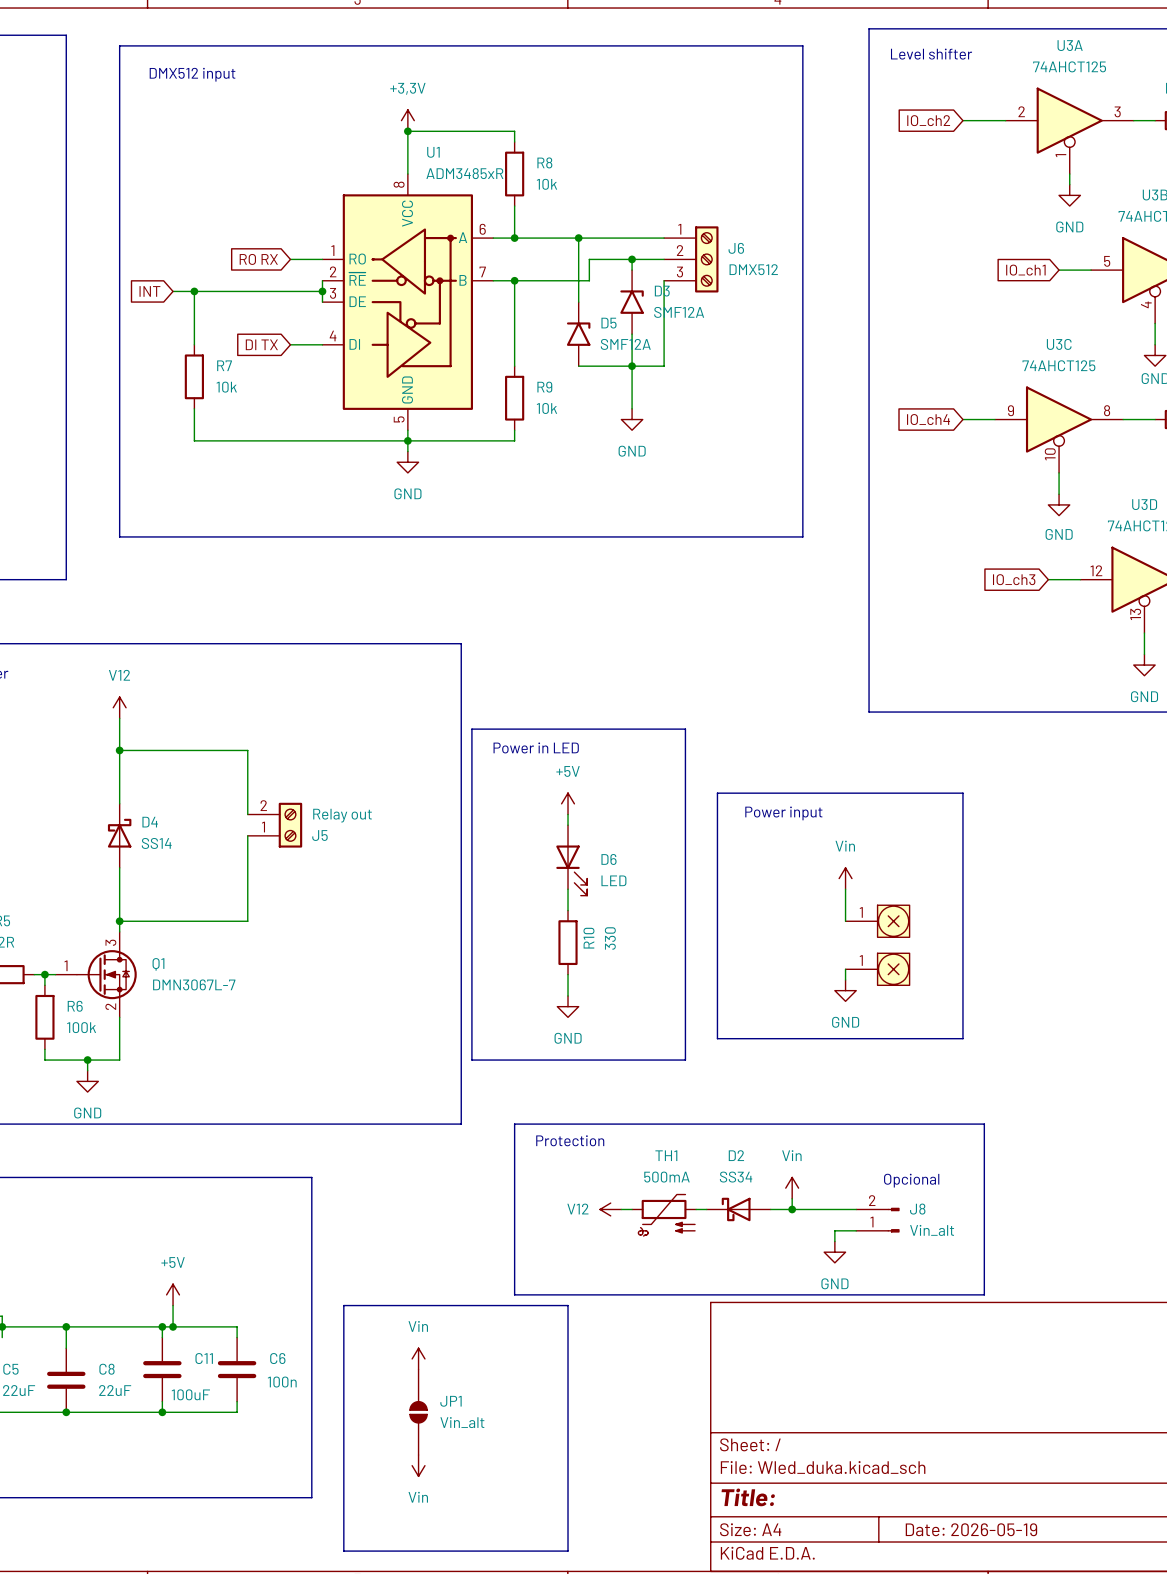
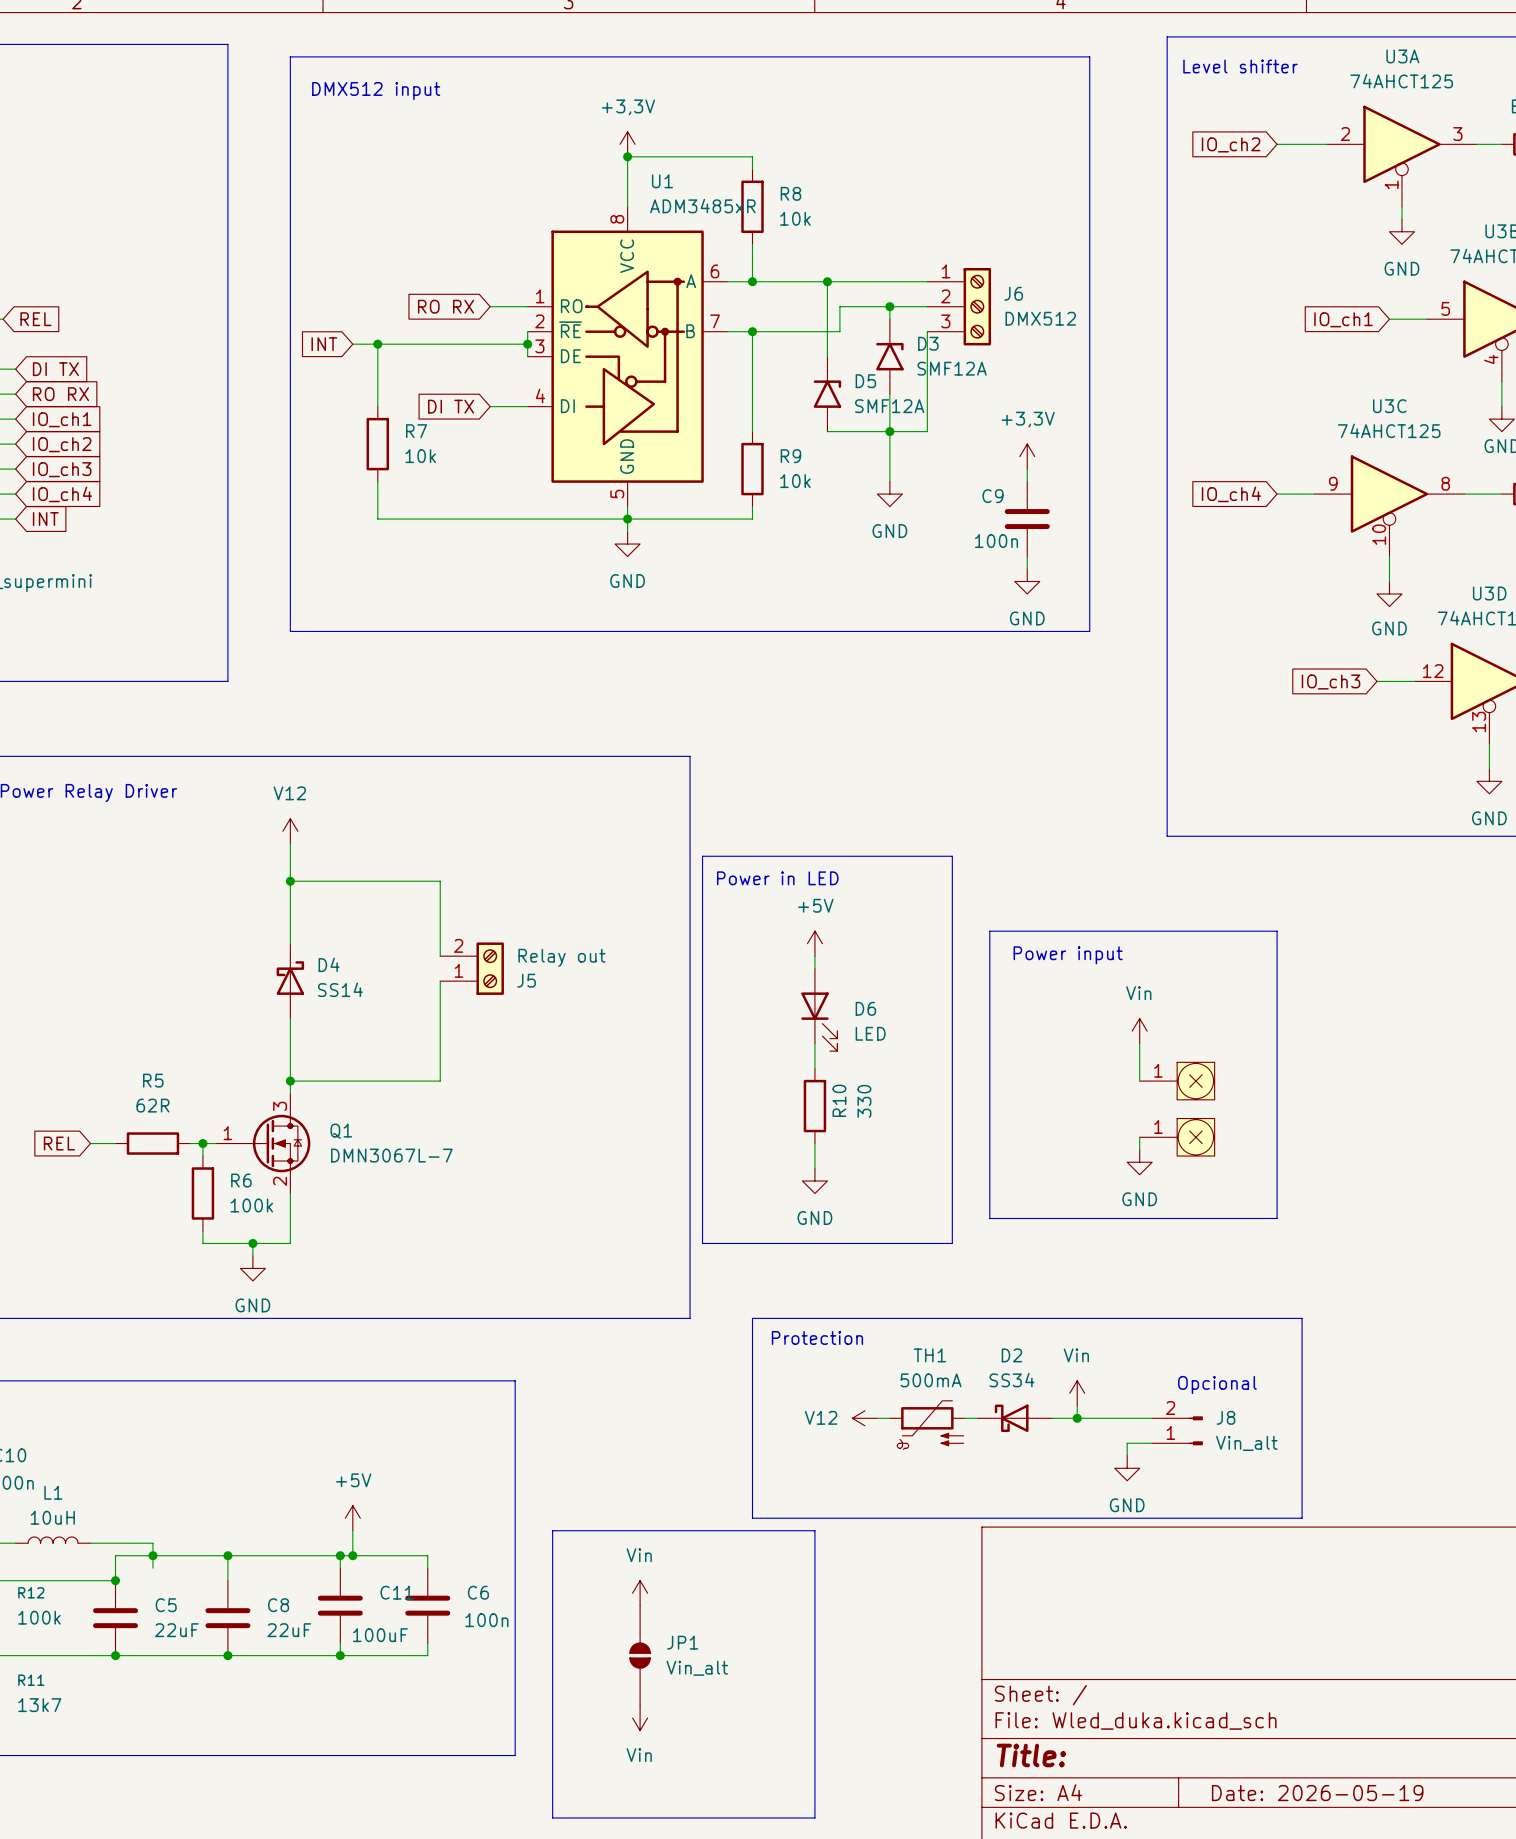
power symbol: none -> +3,3V (1027, 456)
wire: none -> (1027, 469) (1027, 481)
C9: none -> 100n (1027, 519)
wire: none -> (1027, 556) (1027, 569)
power symbol: none -> GND (1027, 581)

